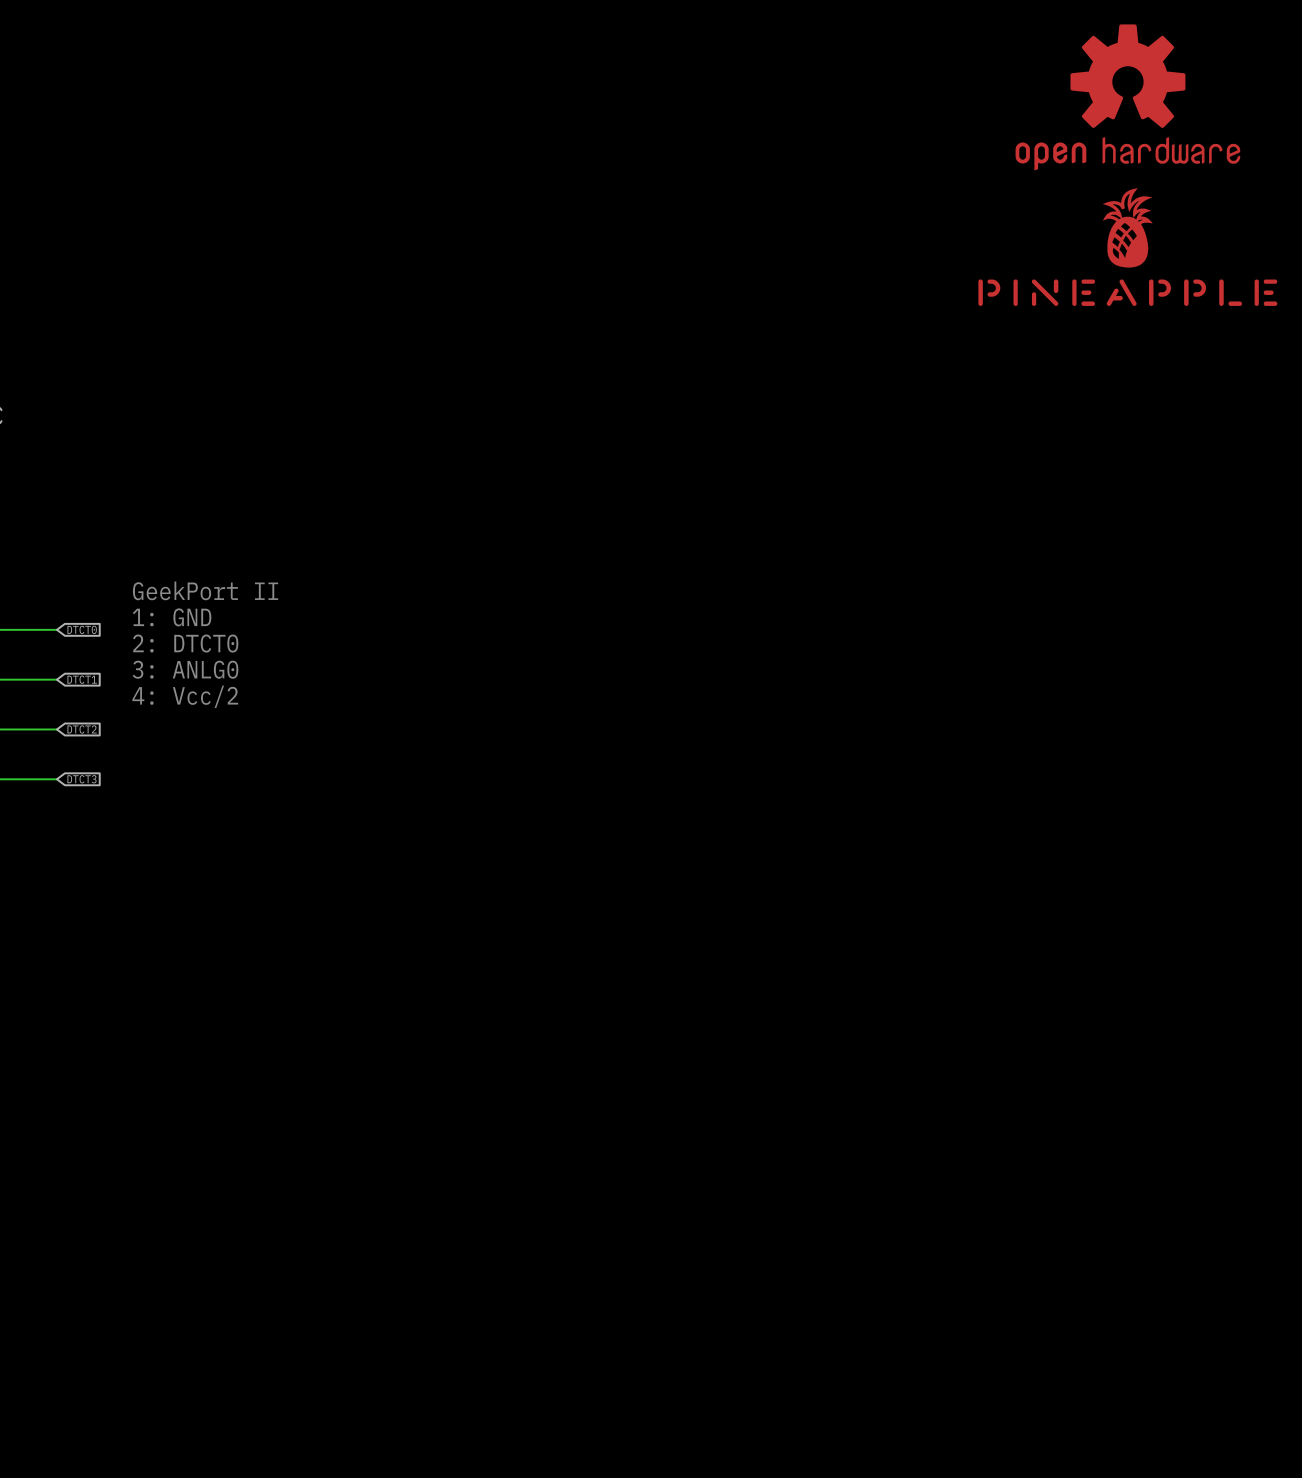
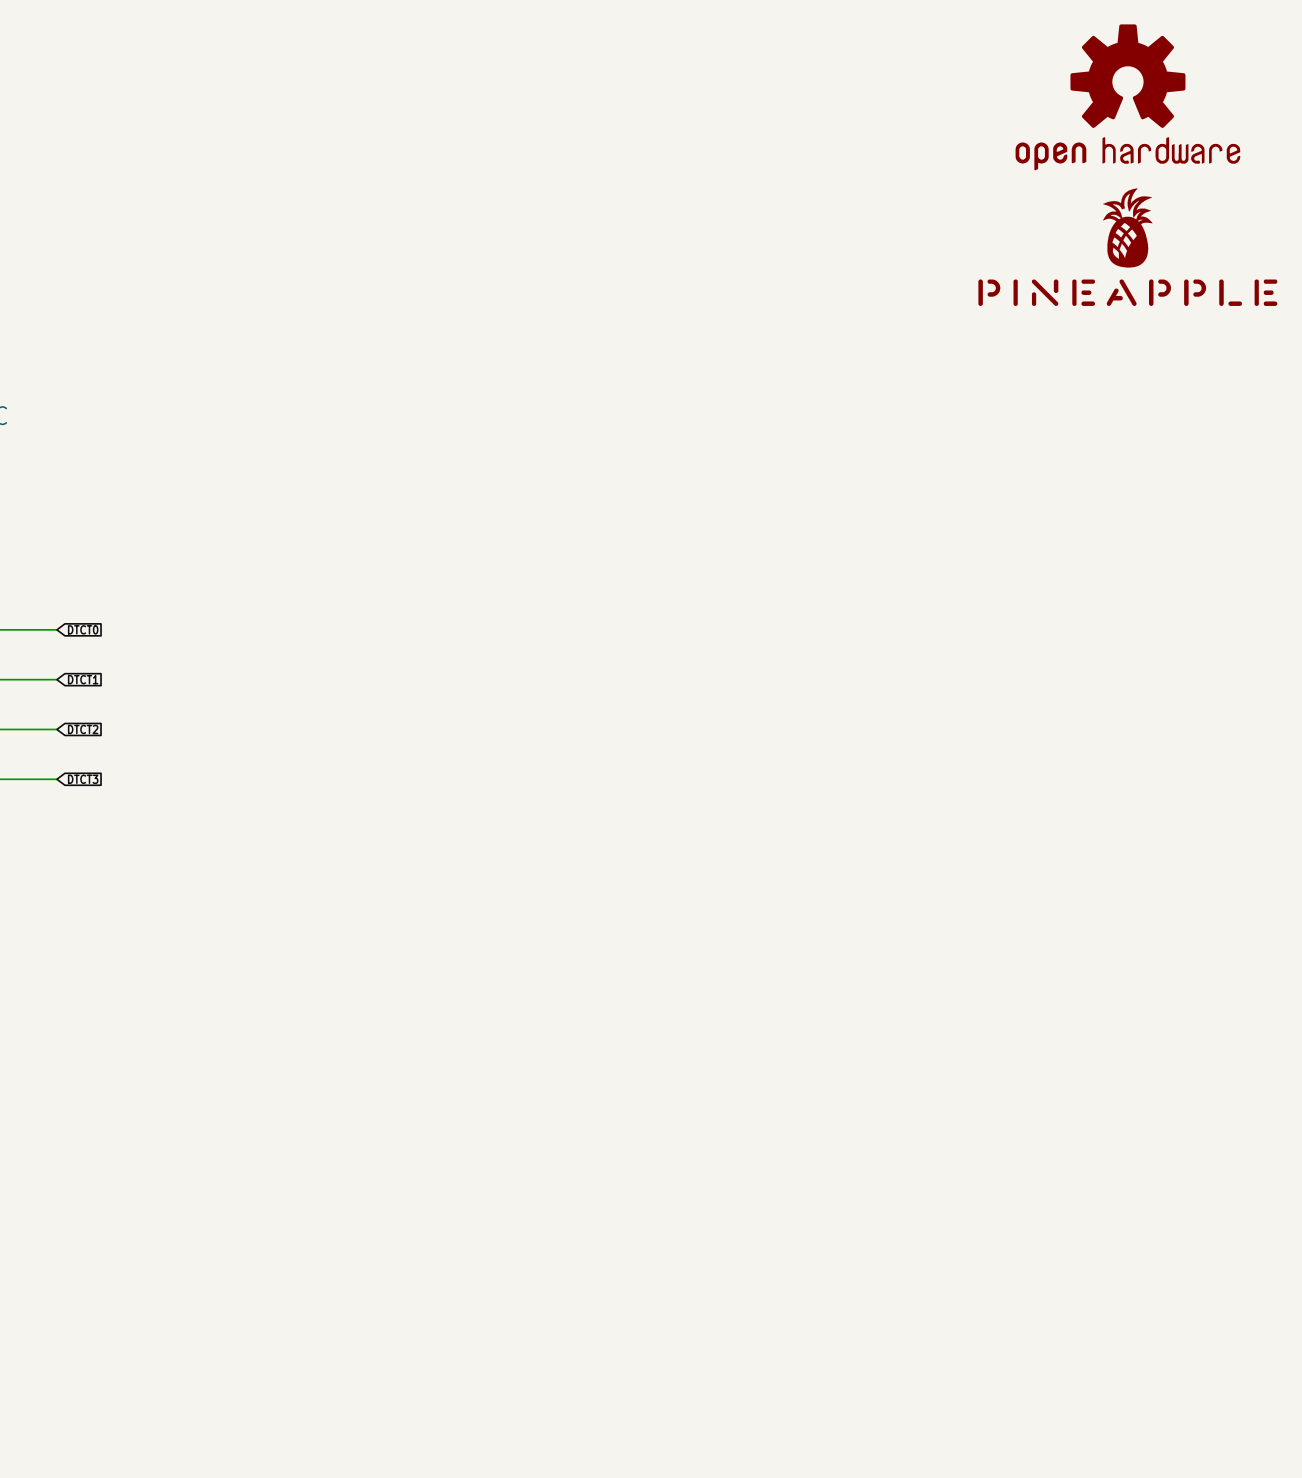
text: GeekPort II (205, 590) -> none
text: 1: GND (172, 617) -> none
text: 2: DTCT0 (185, 643) -> none
text: 3: ANLG0 (185, 669) -> none
text: 4: Vcc/2 (185, 696) -> none

